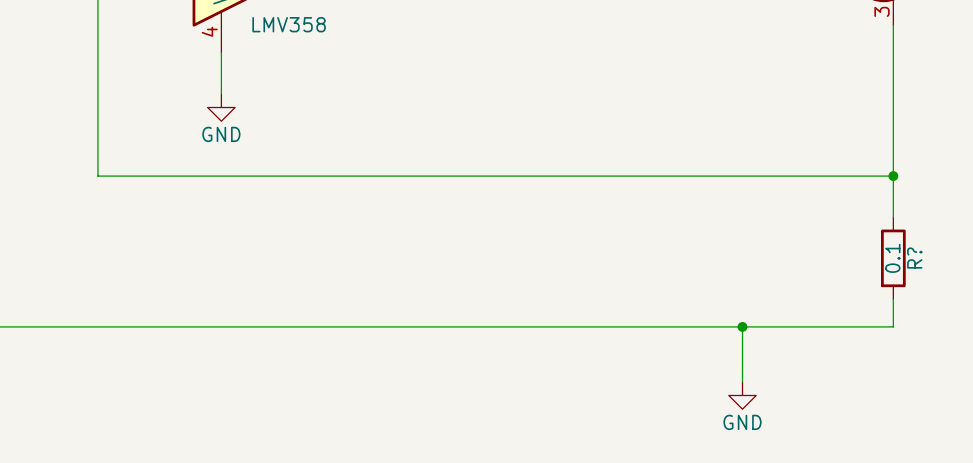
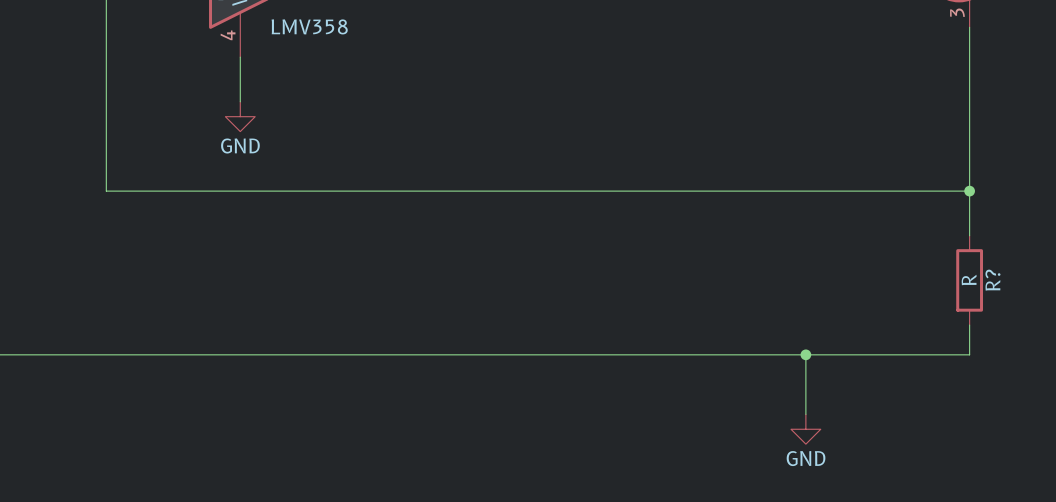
R? value: 0.1 (892, 258) -> R (969, 279)

